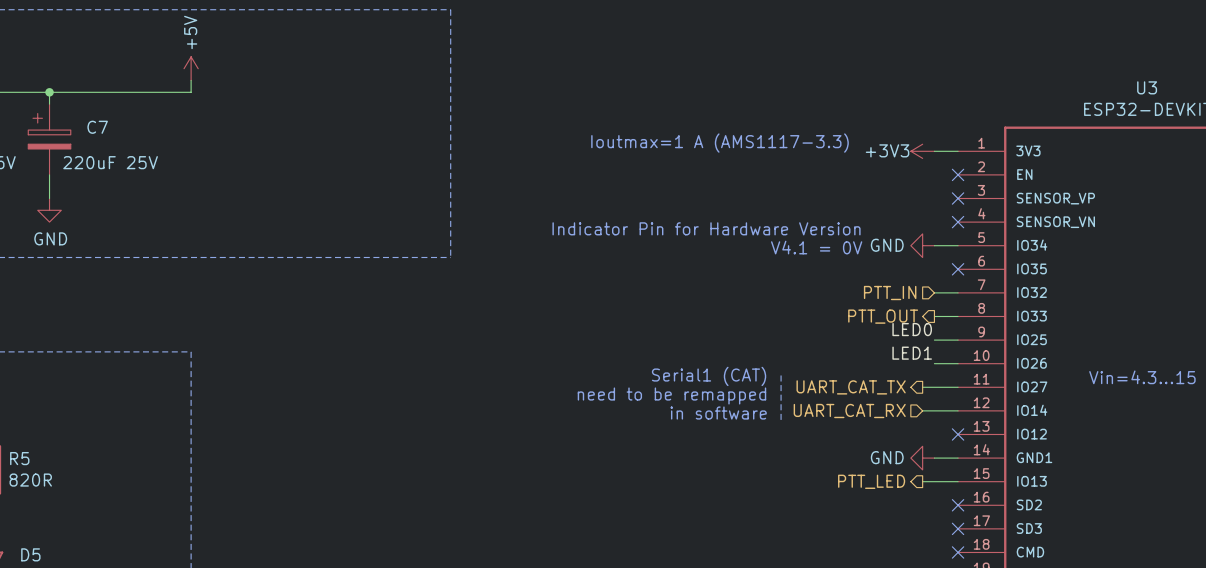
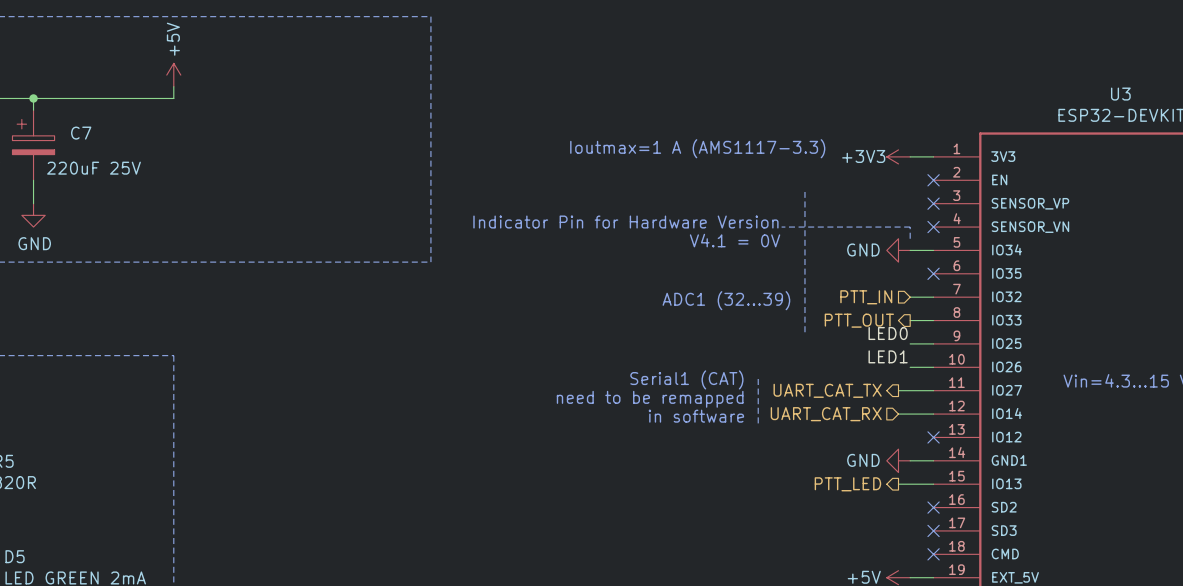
line: none -> (804, 191) (804, 332)
line: none -> (781, 227) (910, 227) (910, 238)
text position: Indicator Pin for Hardware Version (706, 228) -> Indicator Pin for Hardware Version (625, 222)
text position: V4.1 = 0V (816, 247) -> V4.1 = 0V (735, 240)
text: none -> ADC1 (32...39) (726, 300)

